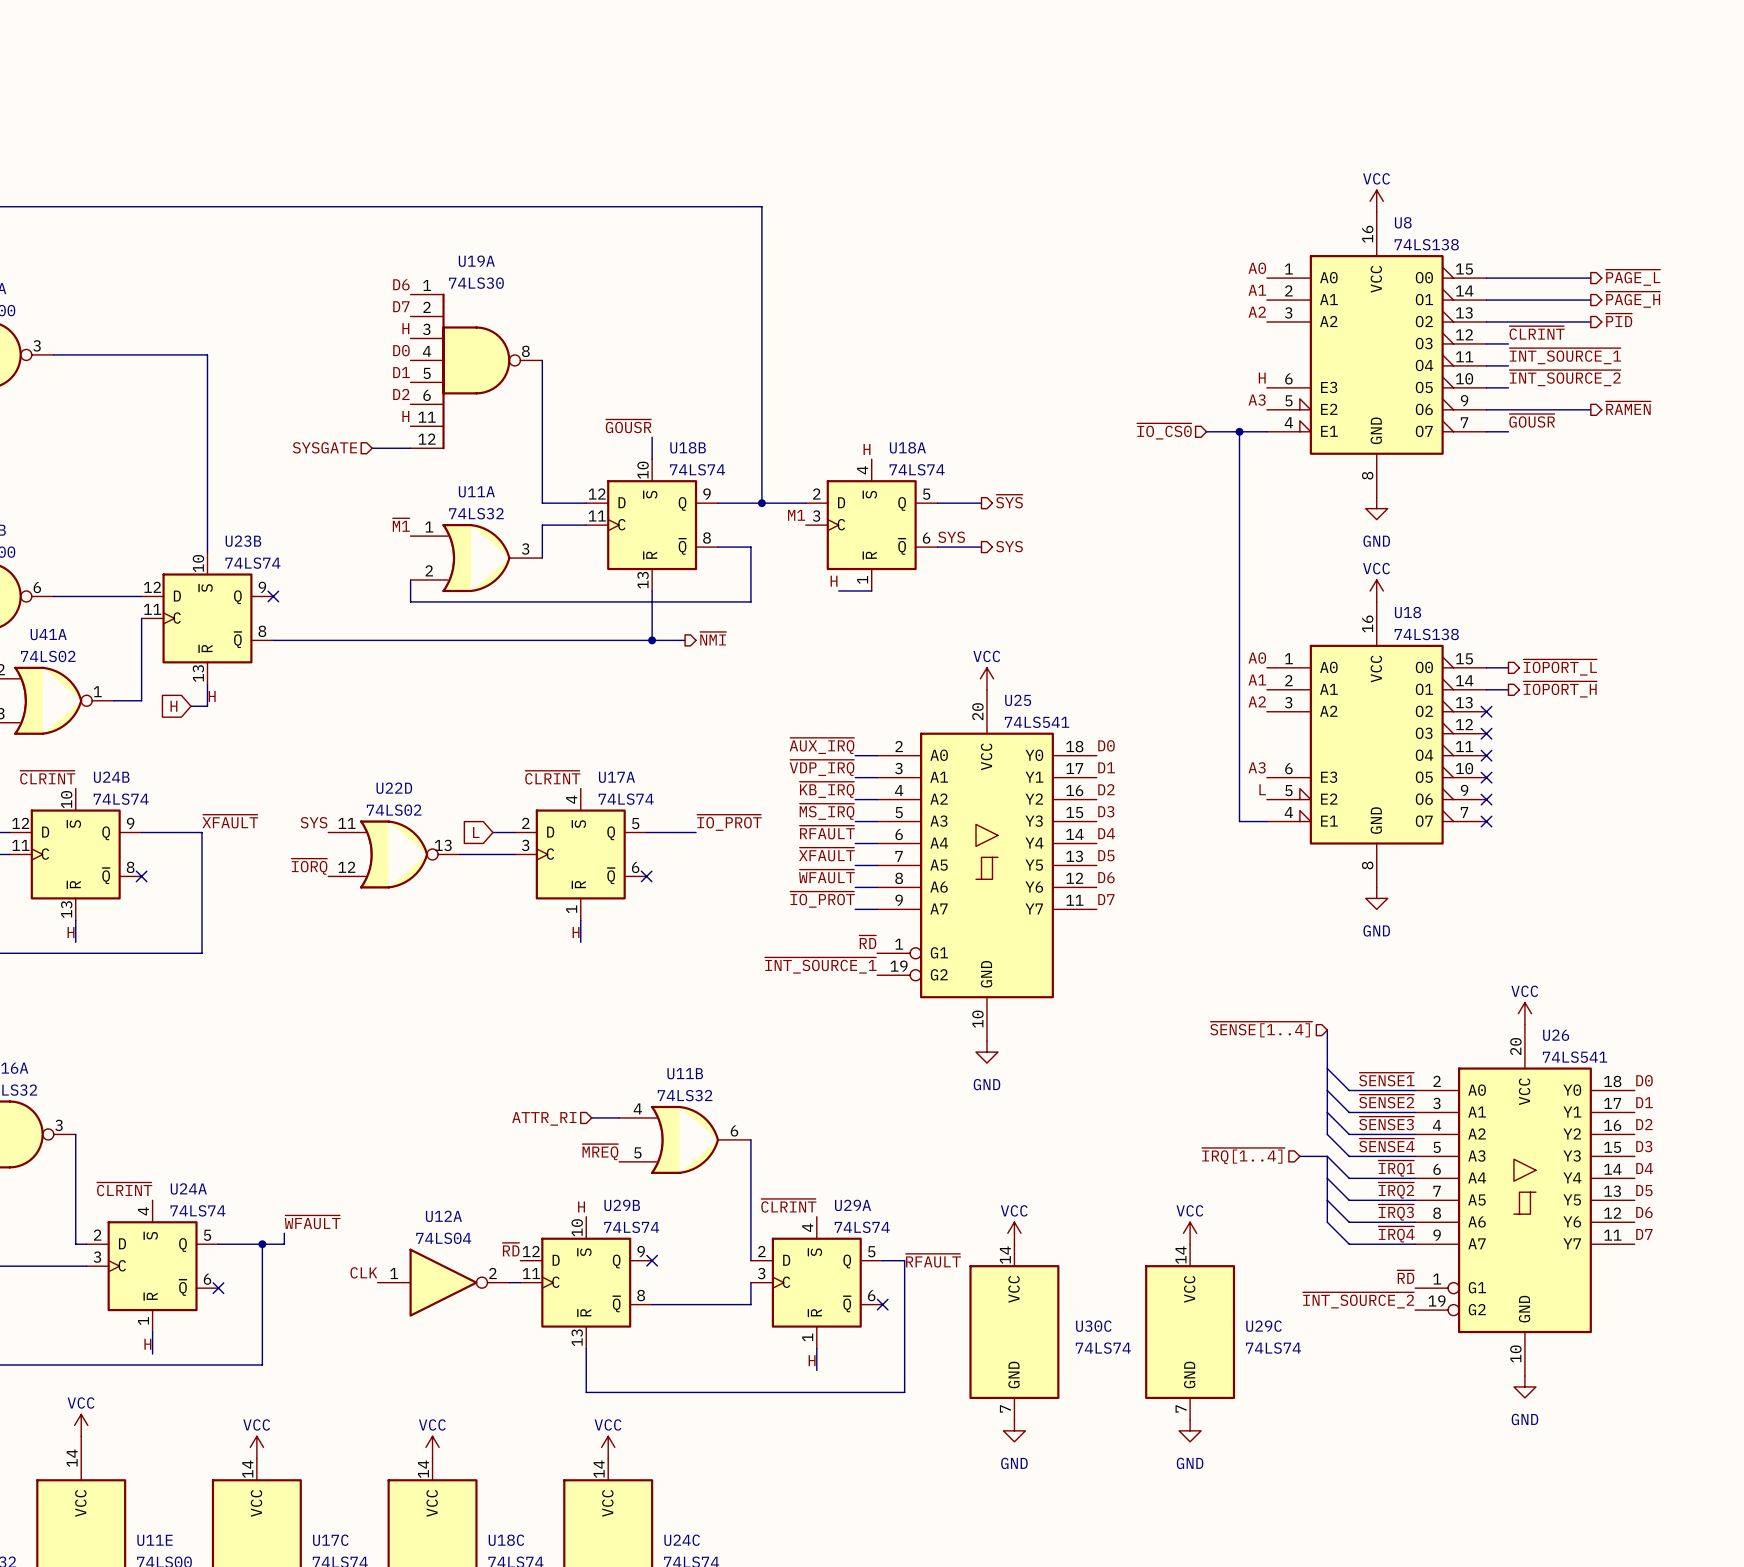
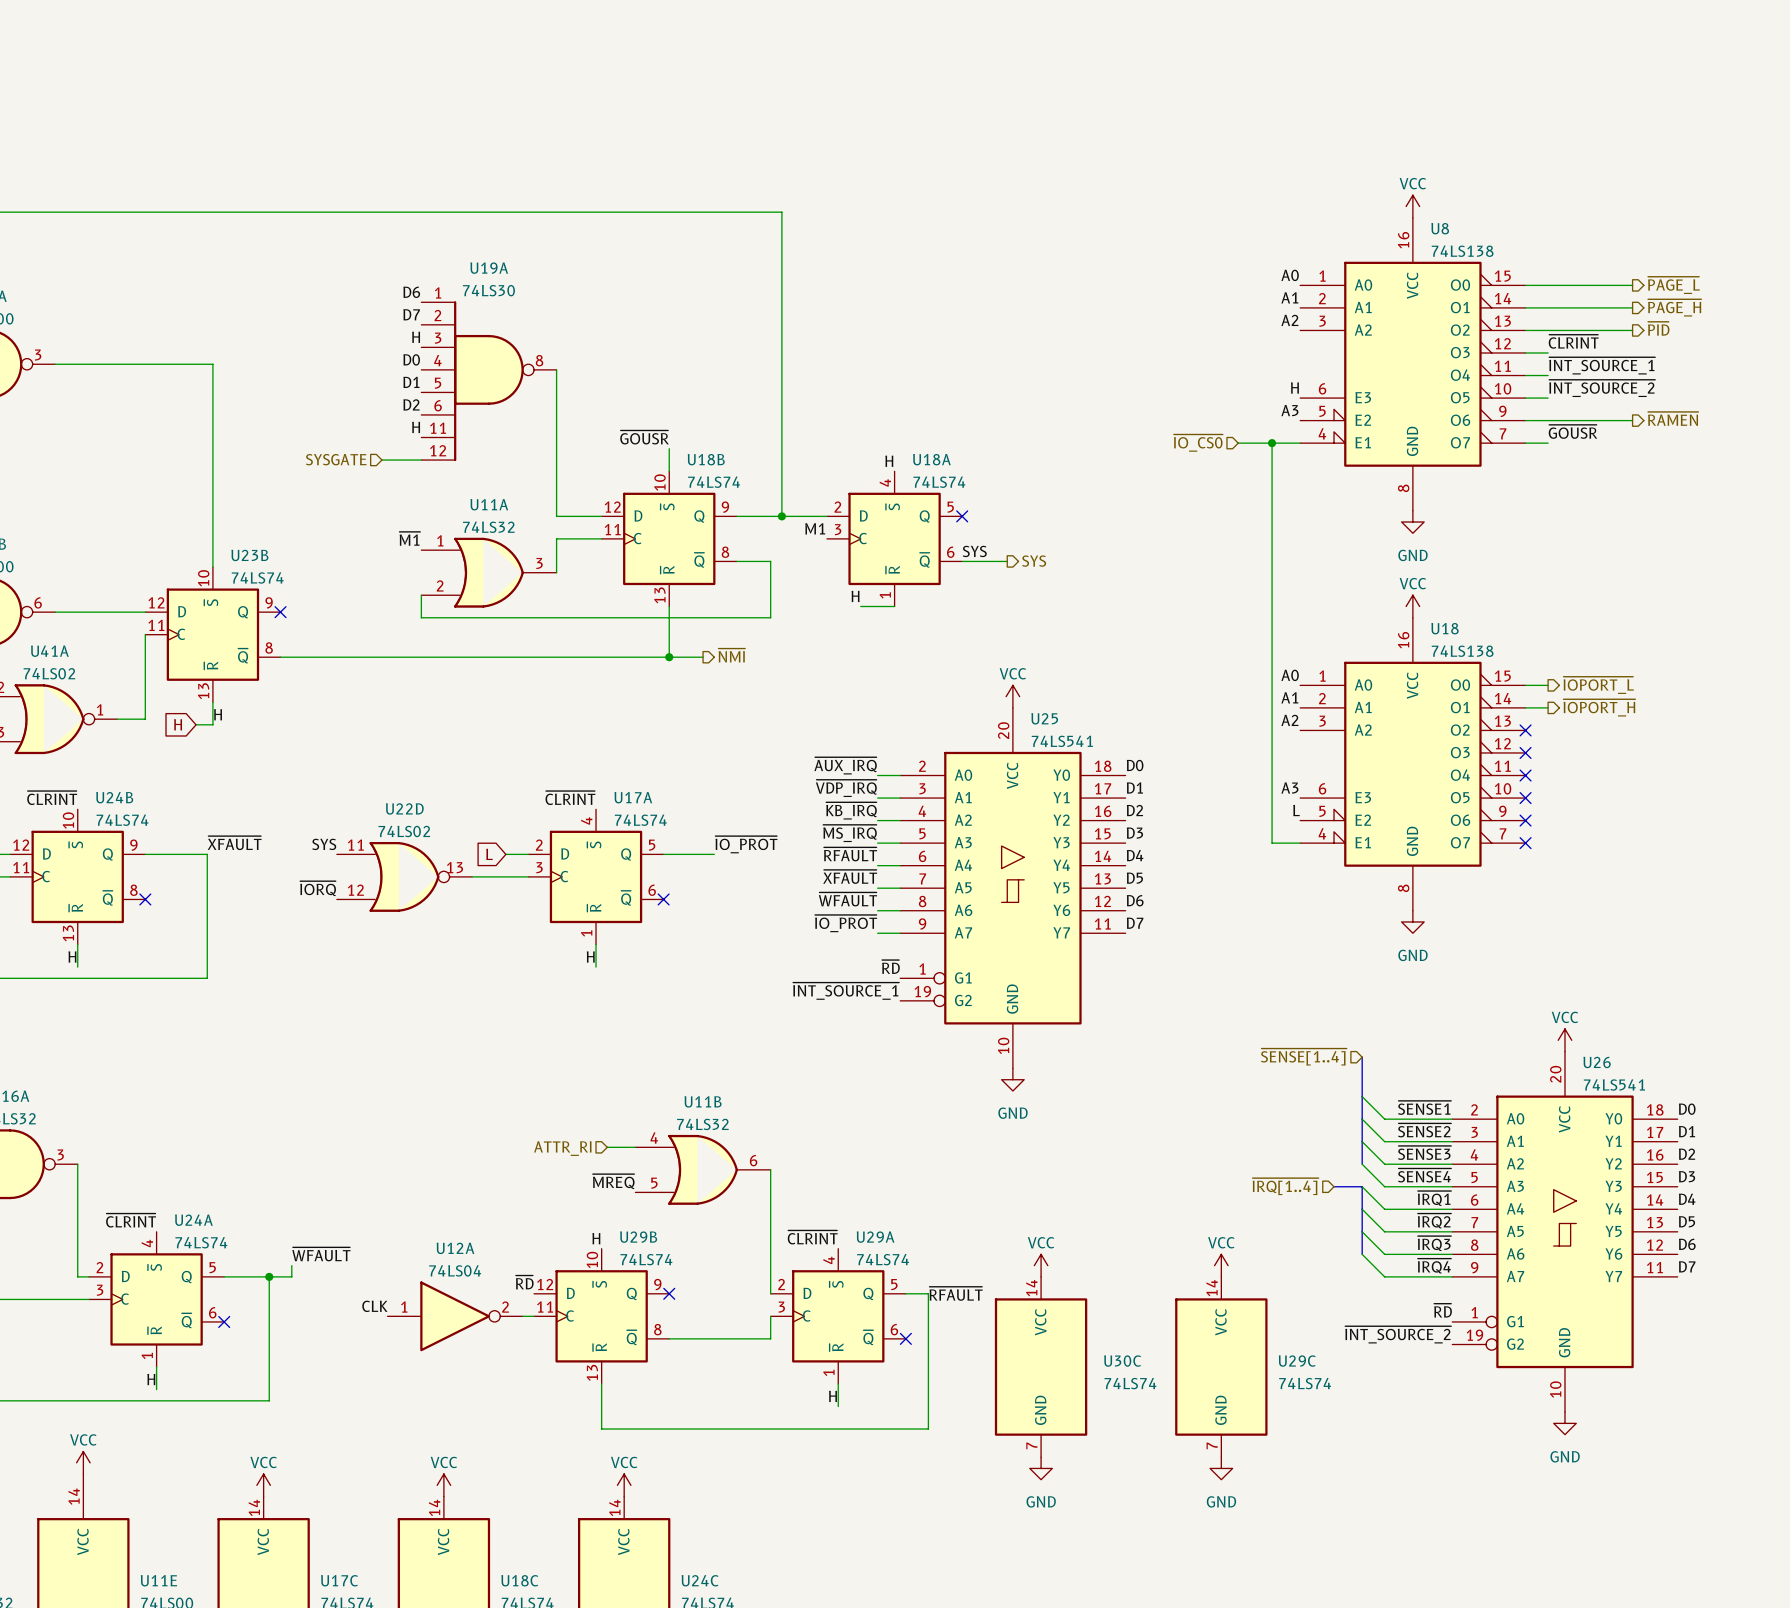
hierarchical label: ~{SYS} (1009, 501) -> none
wire: (937, 503) (981, 503) -> none
no-connect mark: none -> (962, 516)

